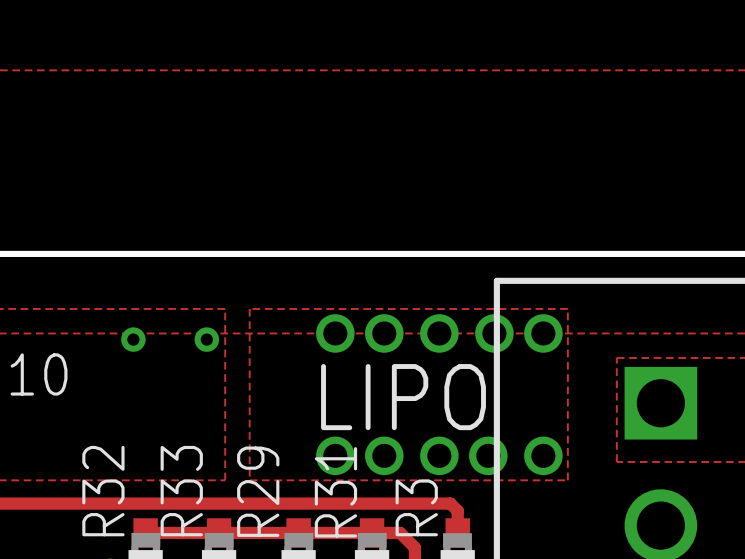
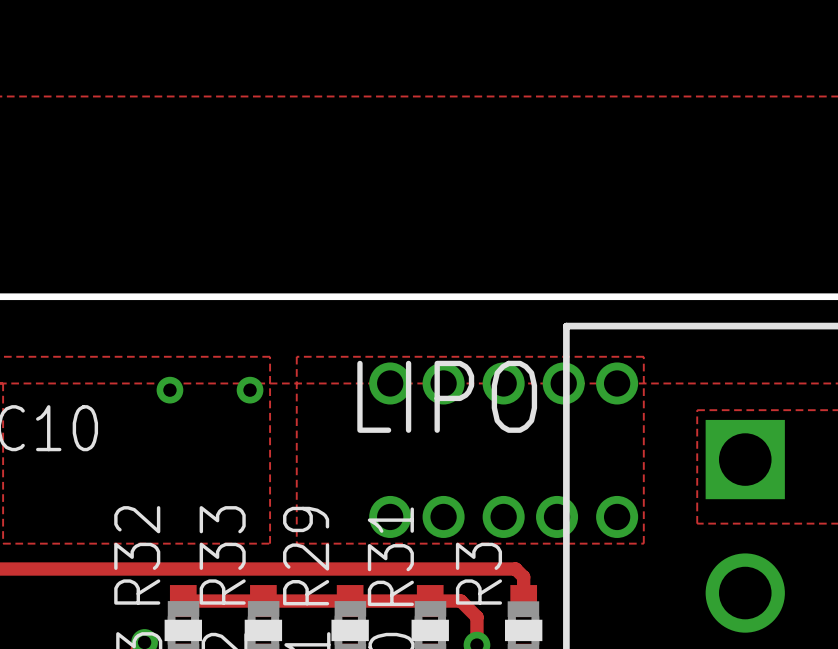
LIPO name position: LIPO (403, 397) -> LIPO (447, 396)

